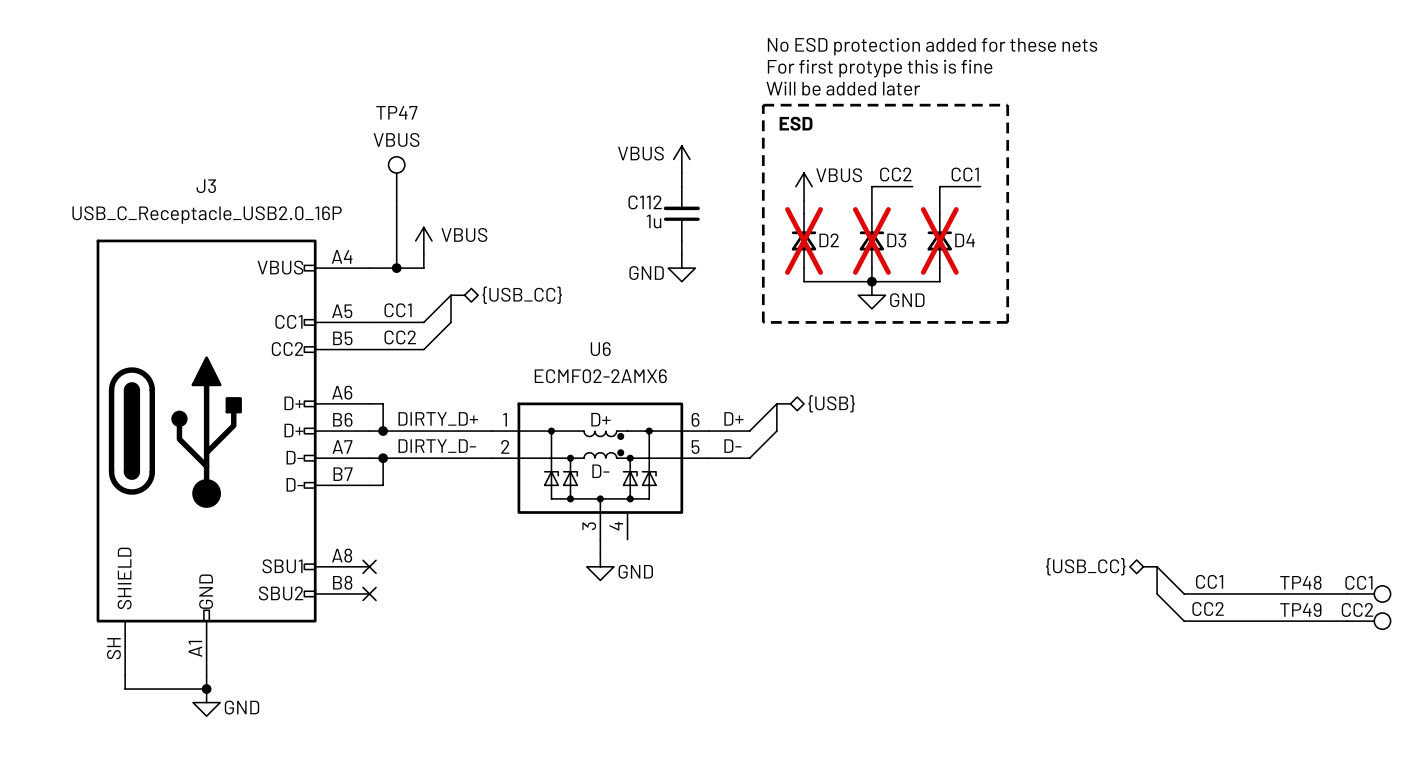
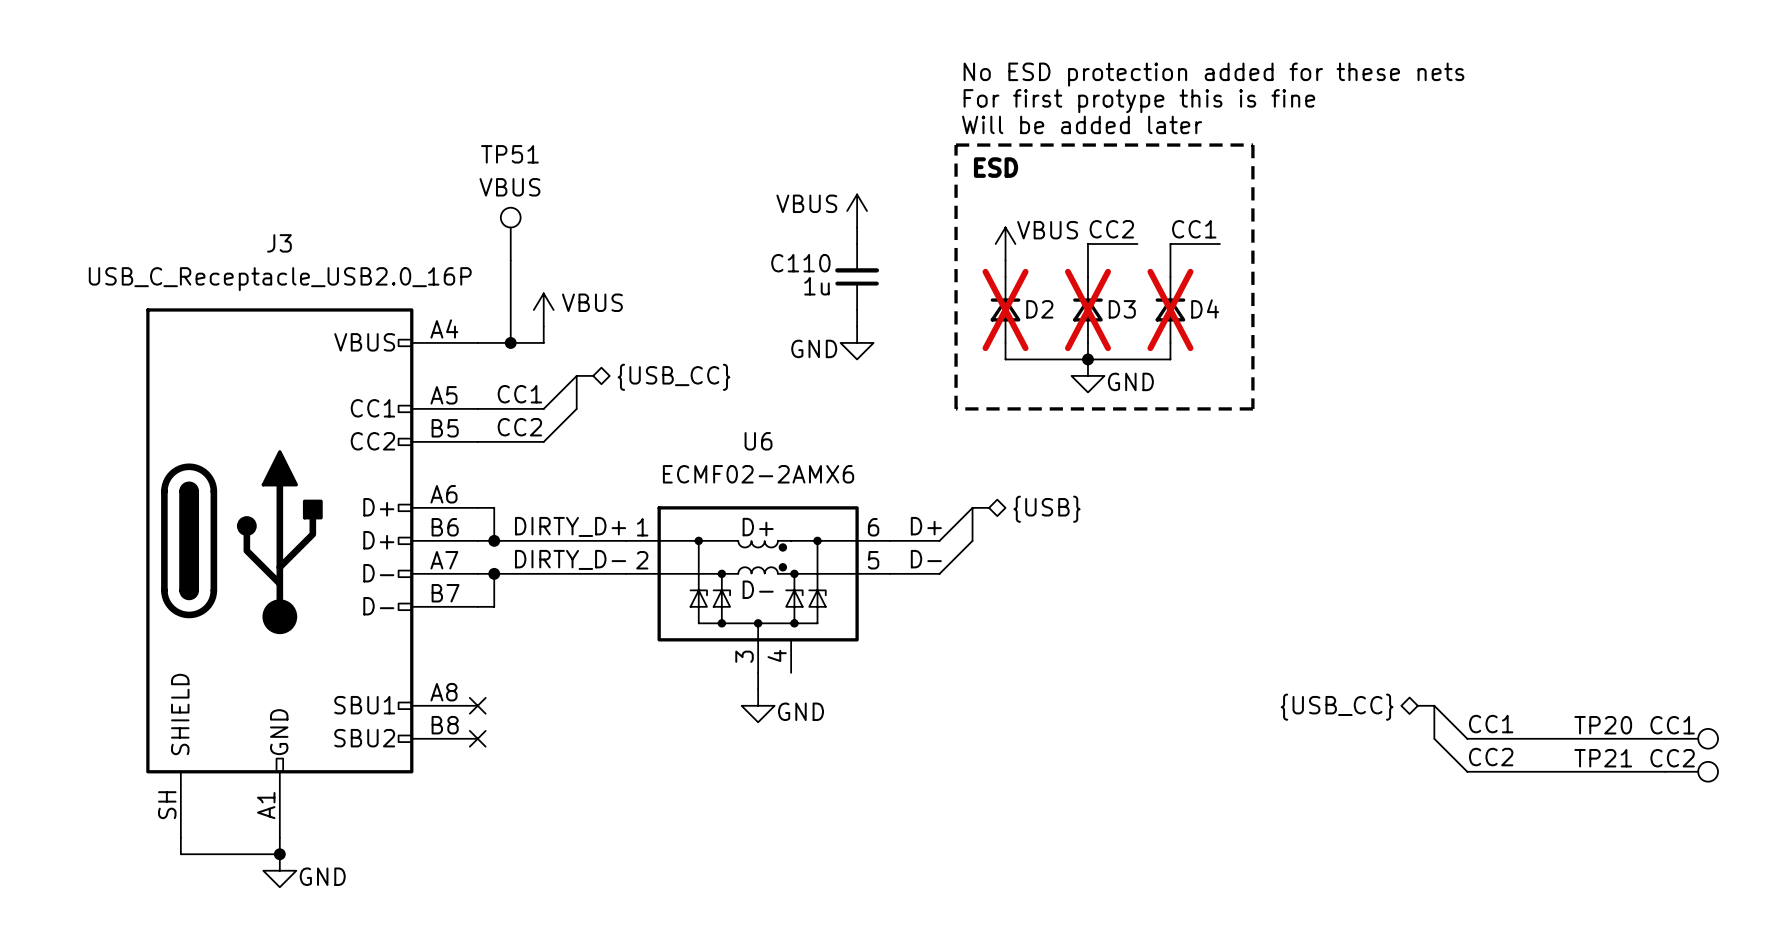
TP47 name: TP47 (396, 112) -> TP51 (509, 154)
C112 name: C112 (645, 202) -> C110 (800, 263)
TP48 name: TP48 (1300, 582) -> TP20 (1603, 725)
TP49 name: TP49 (1300, 609) -> TP21 (1603, 758)

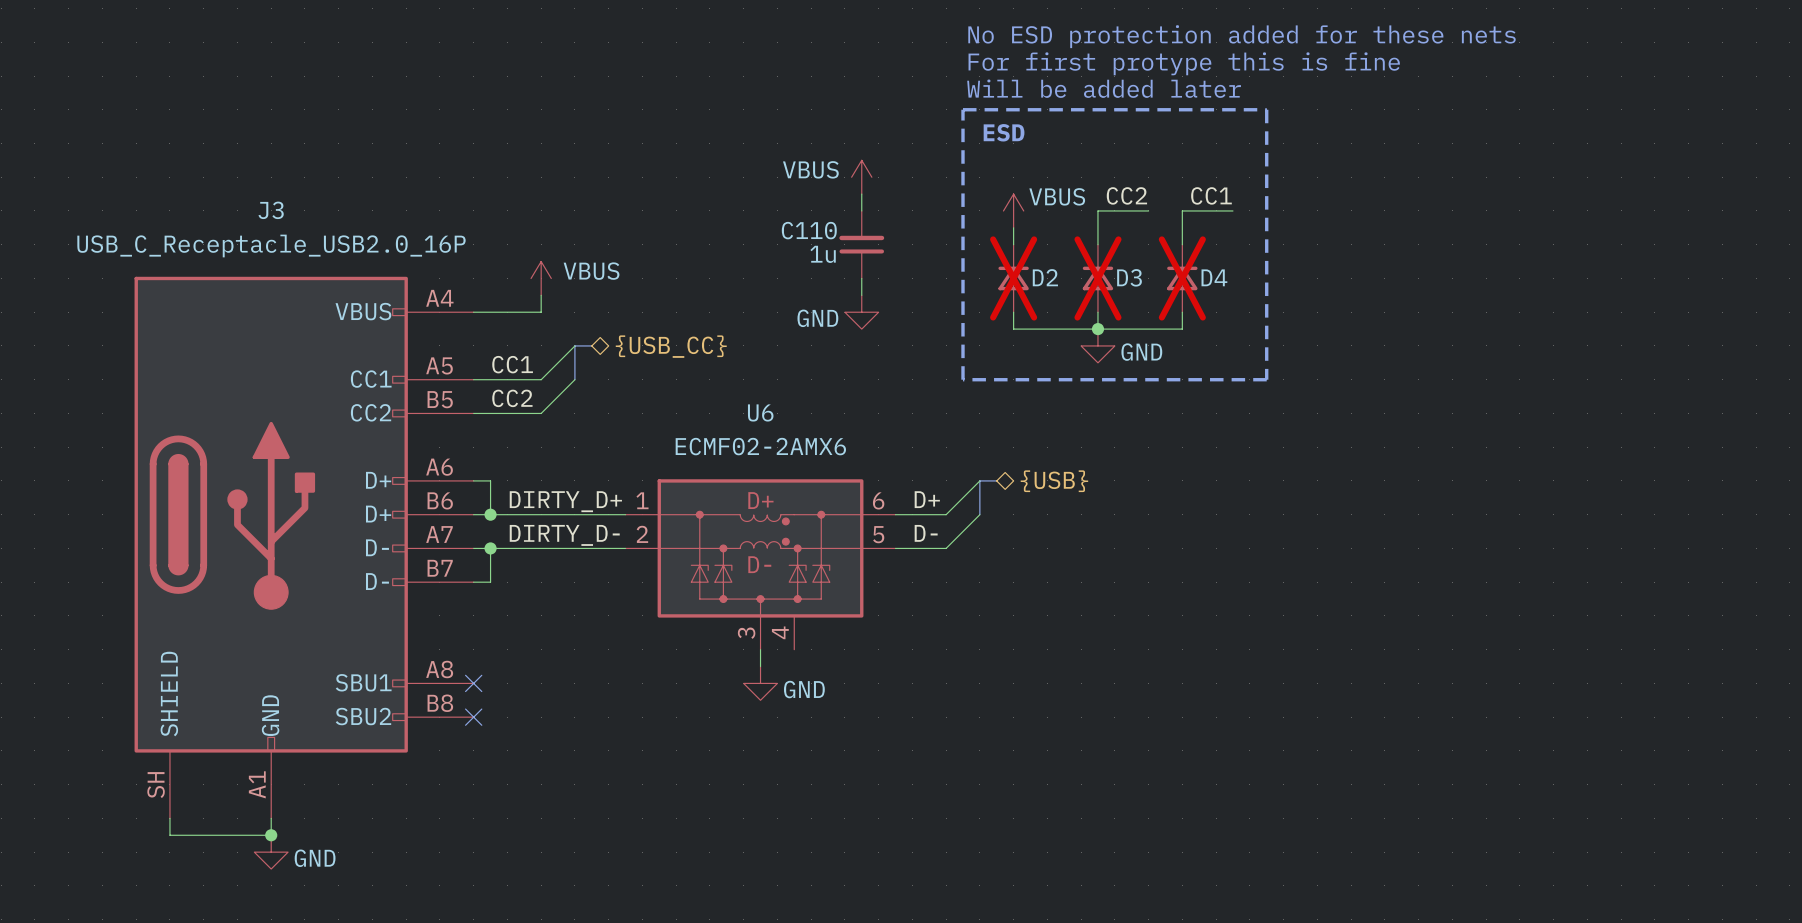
TP51: VBUS (510, 234) -> none
wire: (510, 260) (510, 342) -> none
junction: (510, 342) -> none
bus: (1417, 705) (1434, 705) (1434, 738) -> none
wire: (1434, 705) (1467, 738) (1665, 738) -> none
hierarchical label: {USB_CC} (1337, 707) -> none
label: CC1 (1491, 724) -> none
wire: (1434, 738) (1467, 771) (1665, 771) -> none
TP20: CC1 (1691, 738) -> none
label: CC2 (1491, 757) -> none
TP21: CC2 (1691, 771) -> none

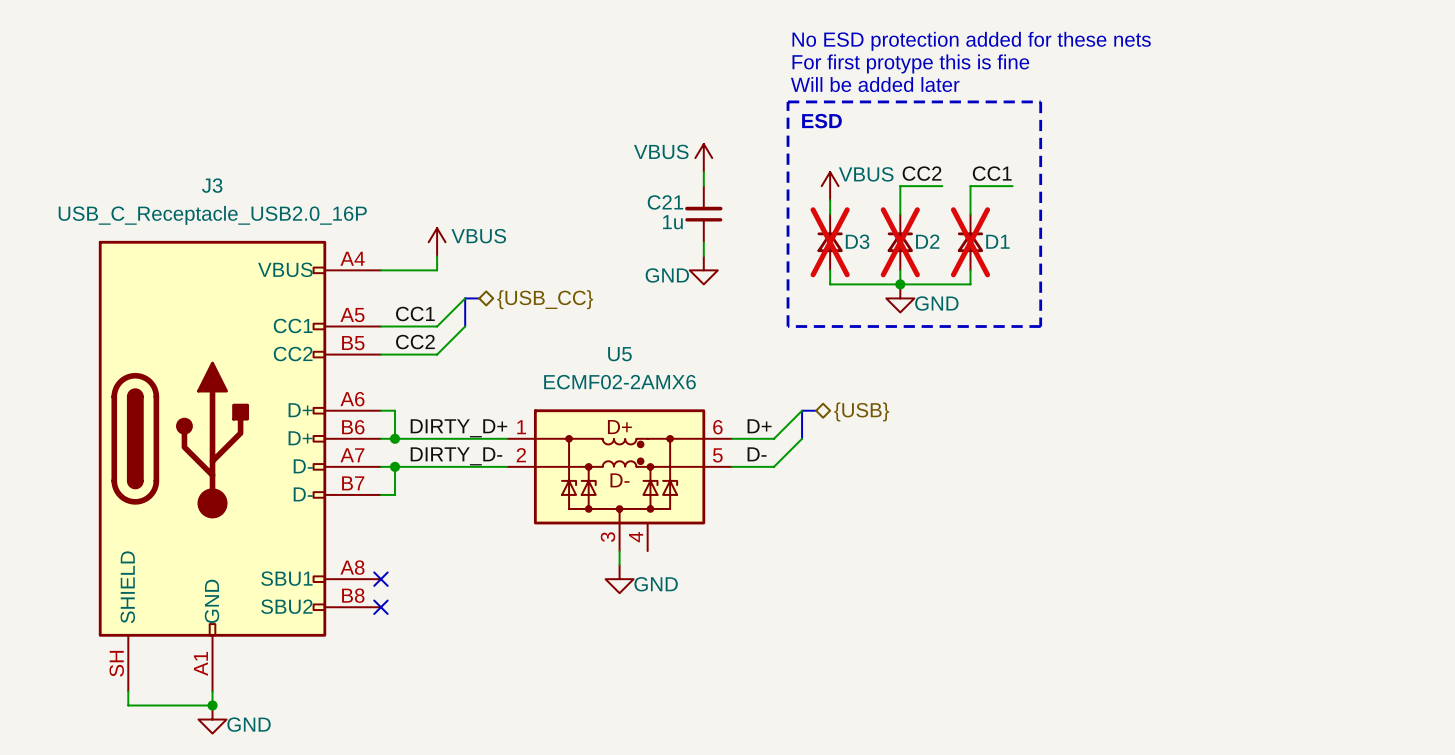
C110 name: C110 (809, 230) -> C21 (665, 202)
D2 name: D2 (1045, 277) -> D3 (857, 241)
D3 name: D3 (1129, 277) -> D2 (927, 241)
D4 name: D4 (1214, 277) -> D1 (997, 241)
U6 name: U6 (760, 412) -> U5 (619, 354)

